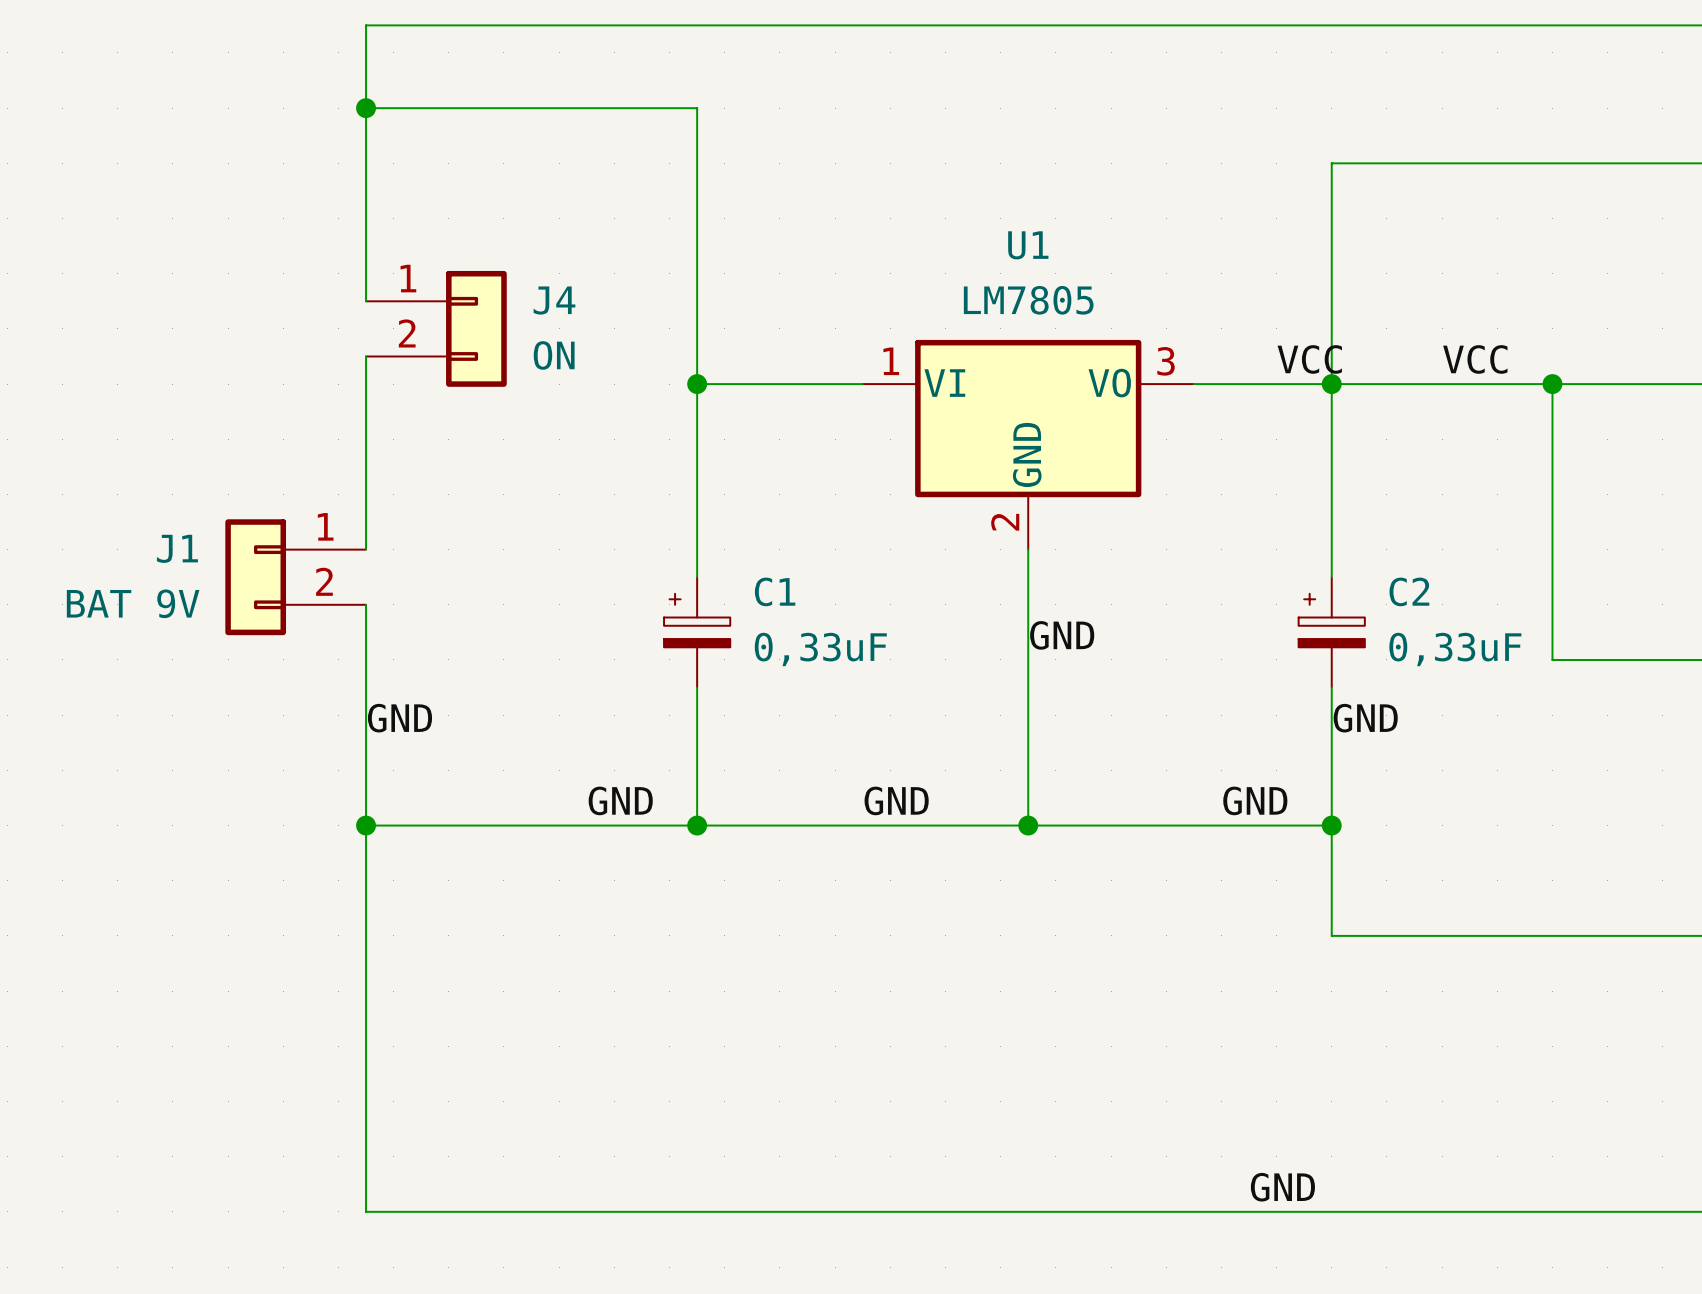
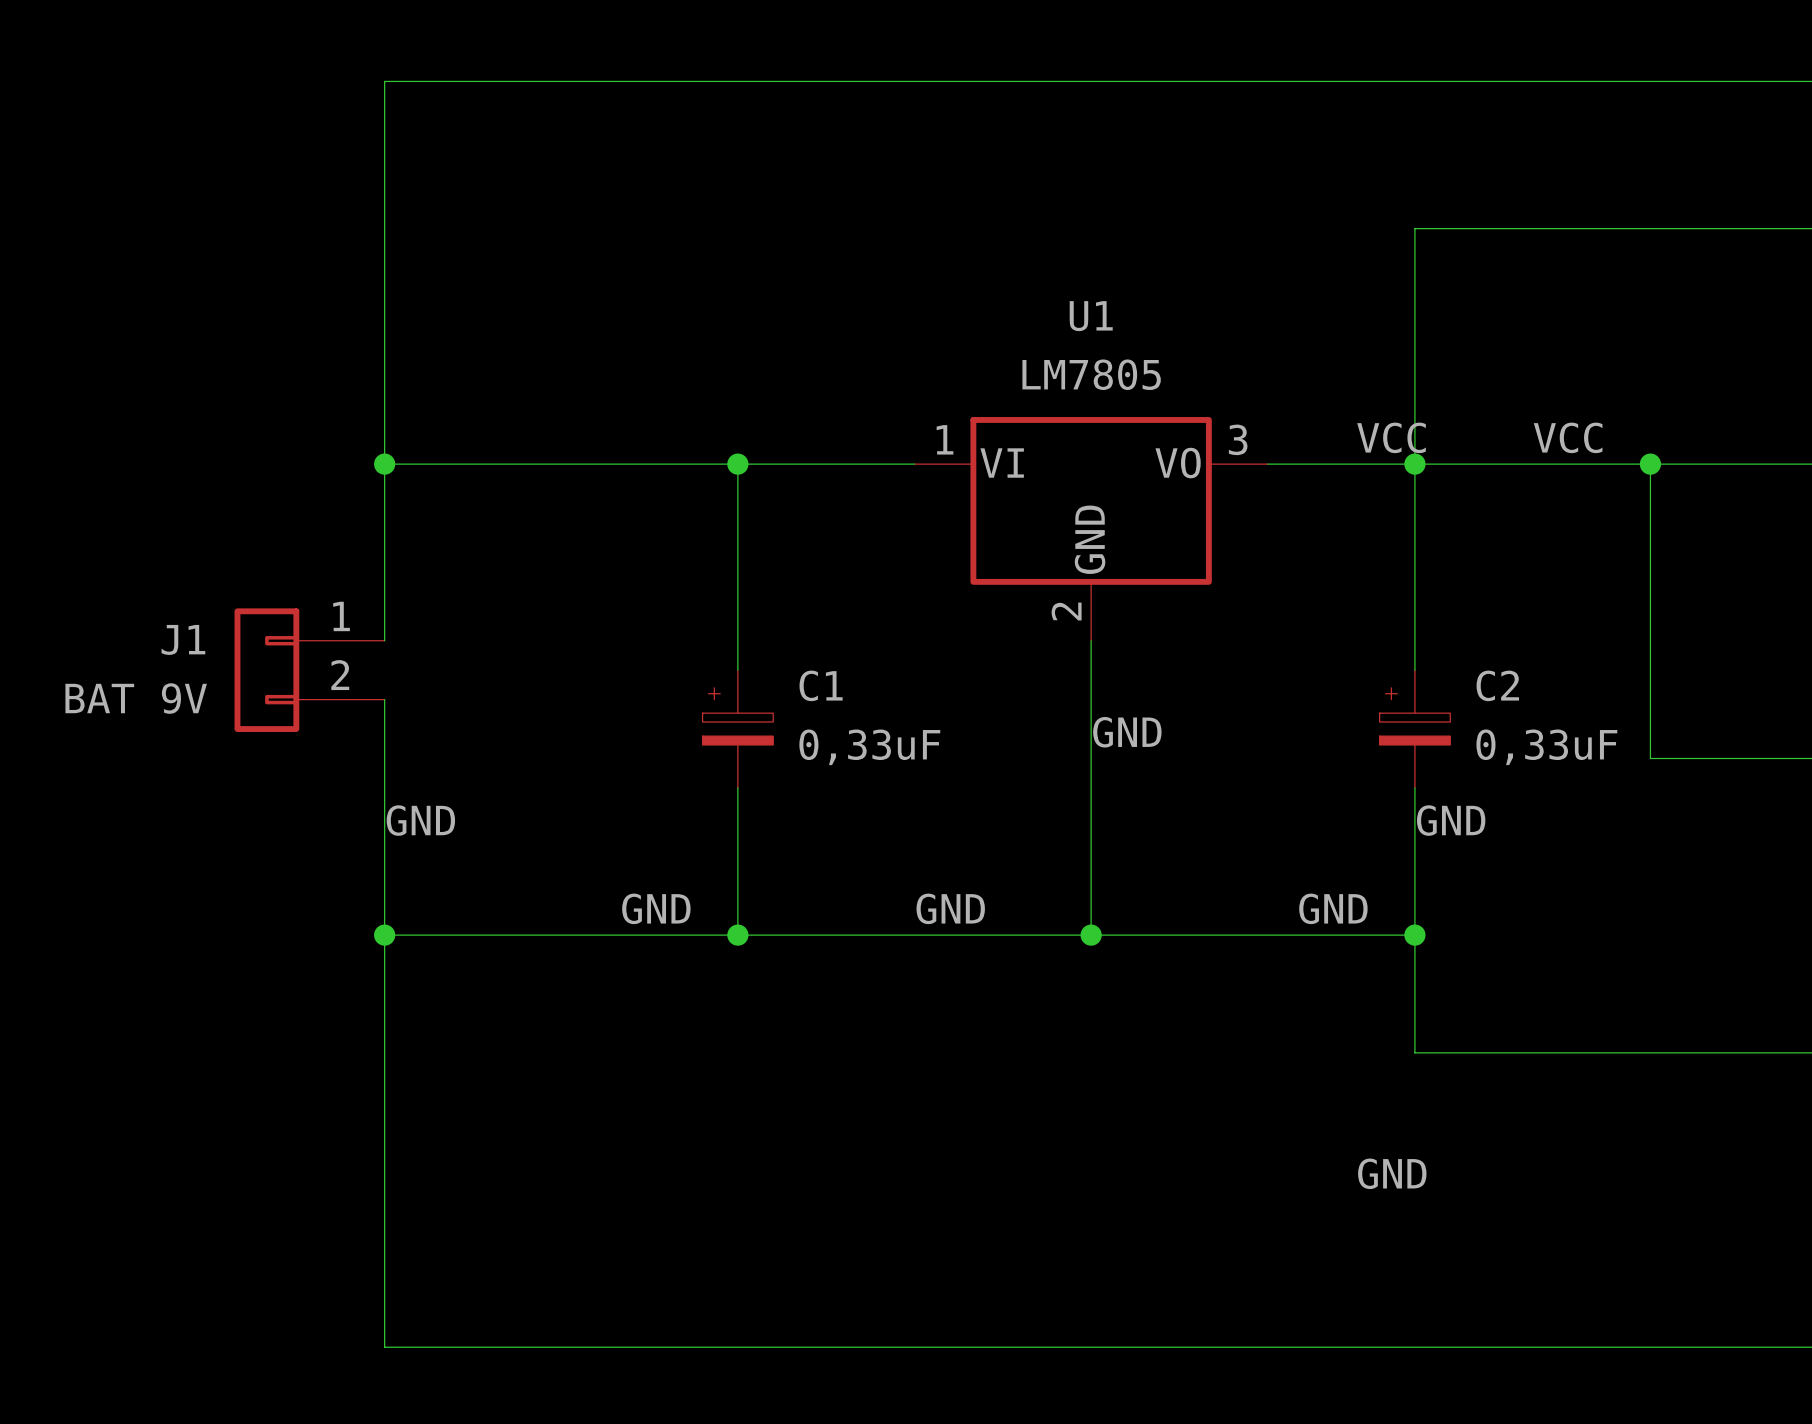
wire: (366, 108) (697, 108) (697, 384) -> (384, 464) (737, 464)
junction: (366, 108) -> none
wire: none -> (384, 375) (384, 434)
J4: ON (436, 328) -> none
junction: none -> (384, 464)
label position: GND (1282, 1187) -> GND (1392, 1173)

